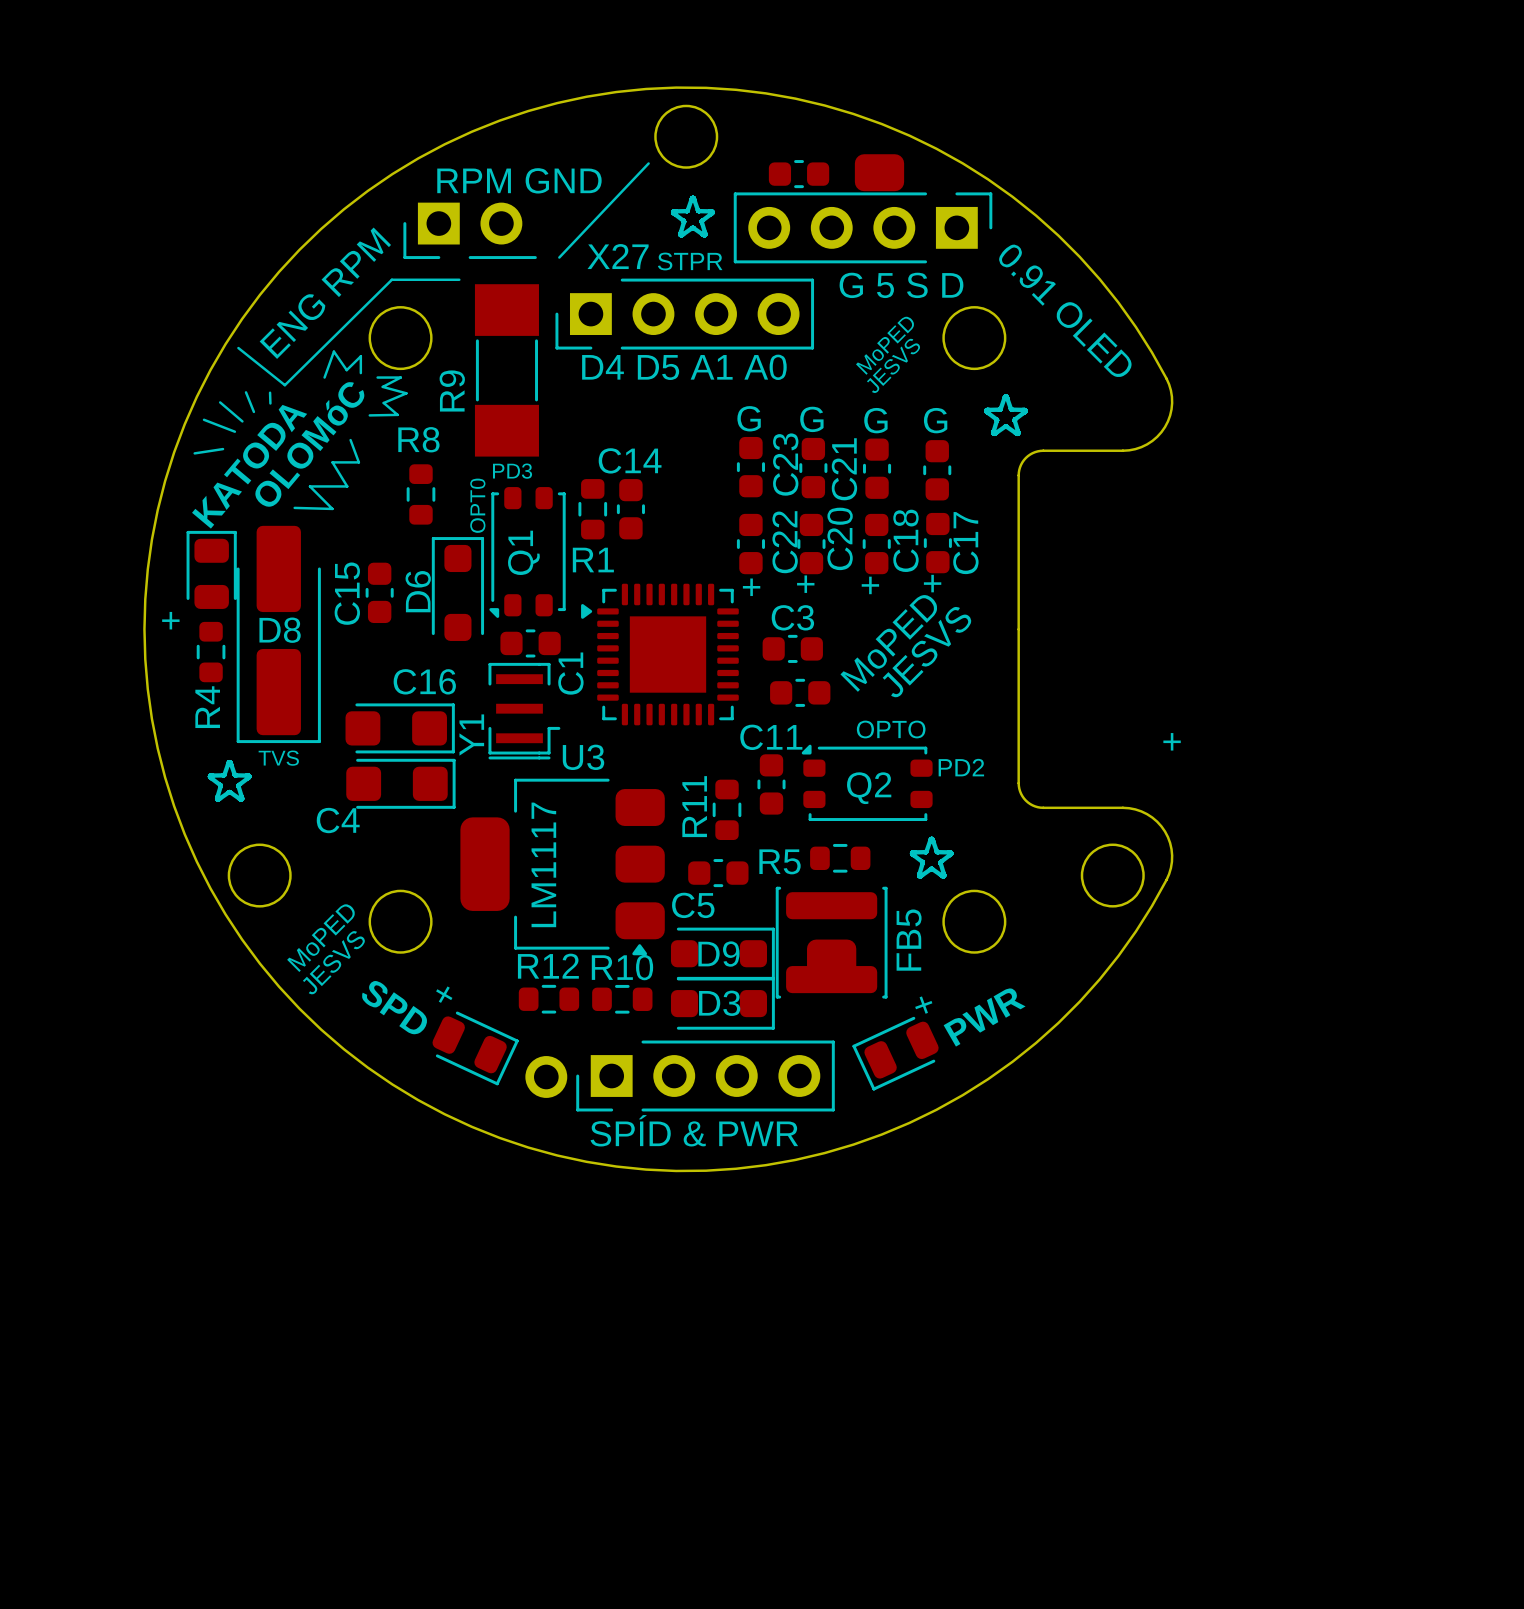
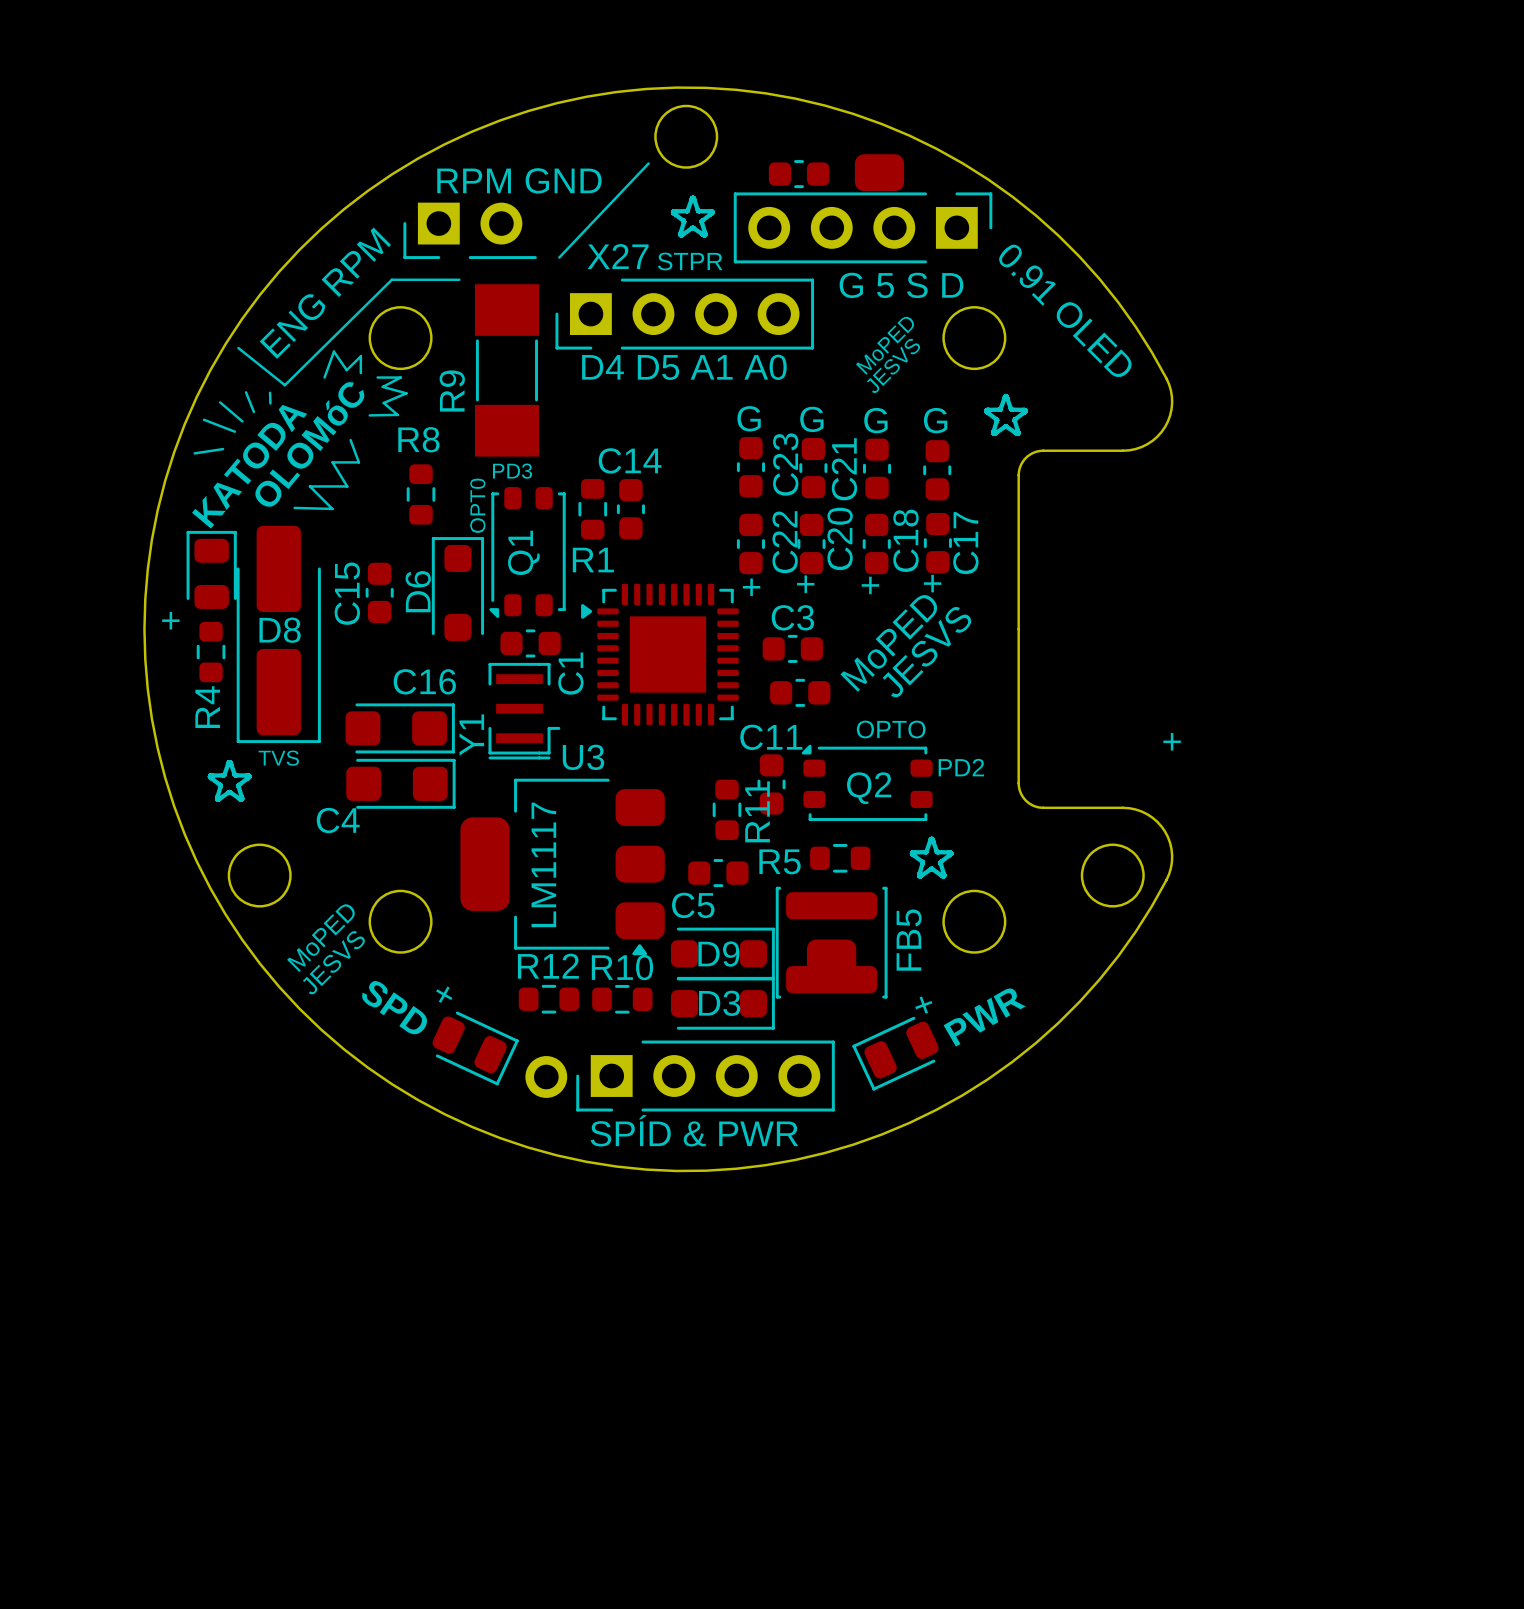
R11 name position: R11 (694, 806) -> R11 (757, 811)

